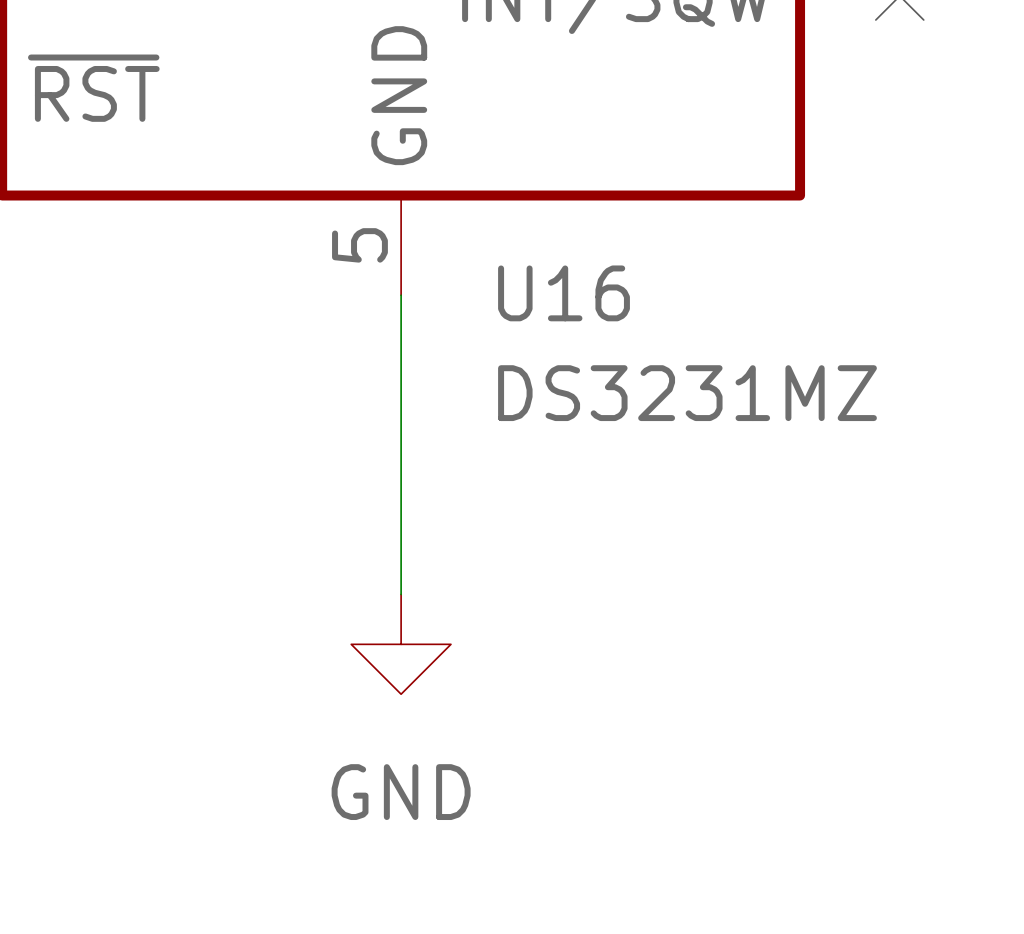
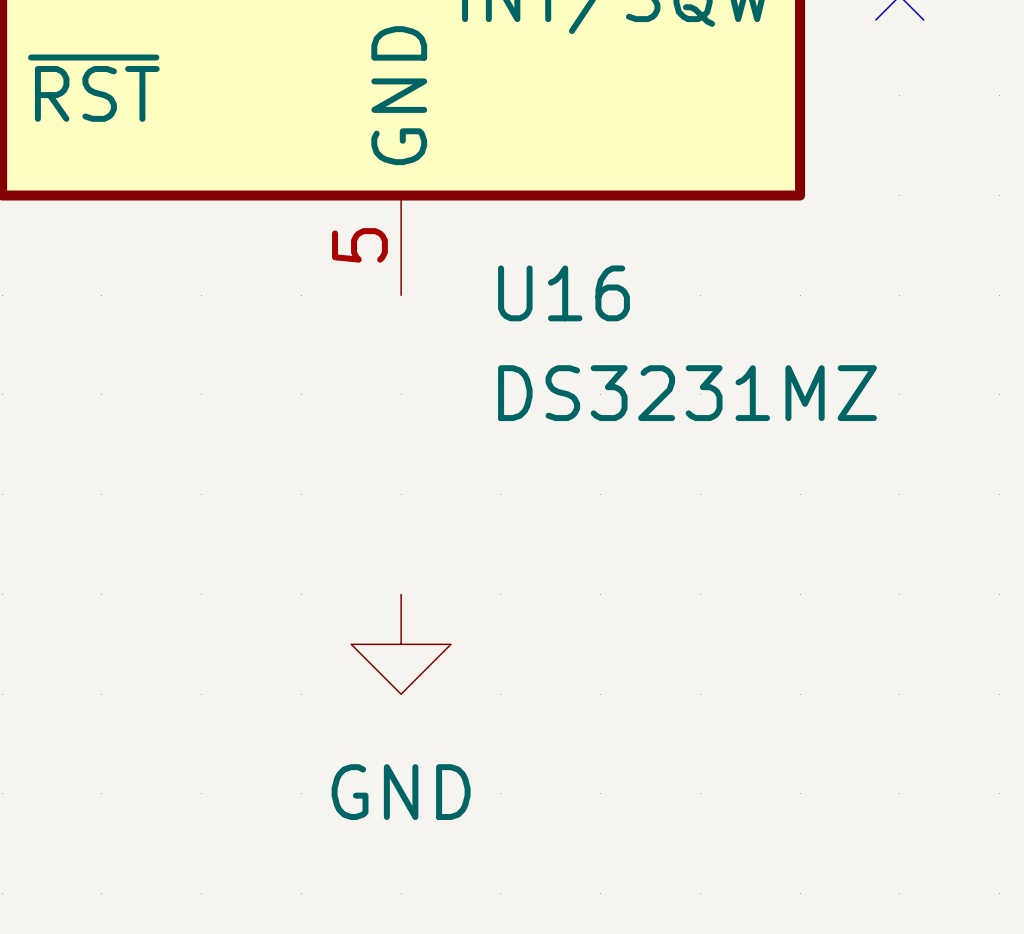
wire: (401, 295) (401, 594) -> none

